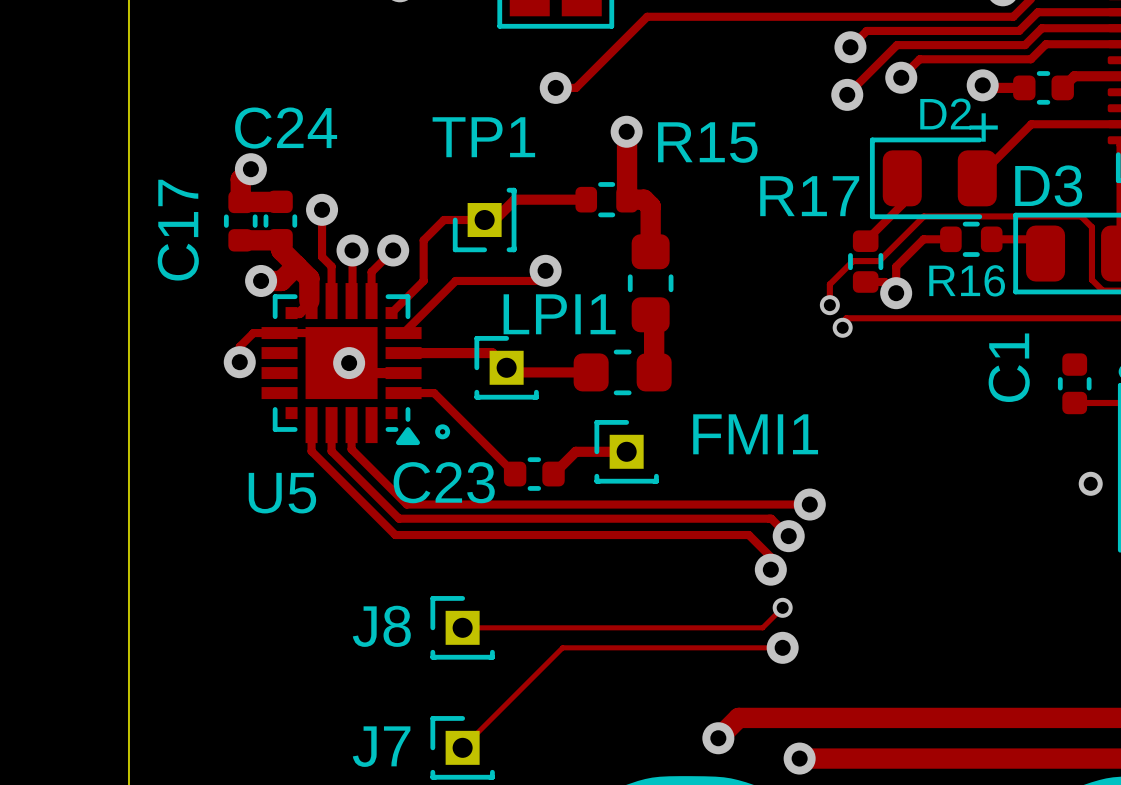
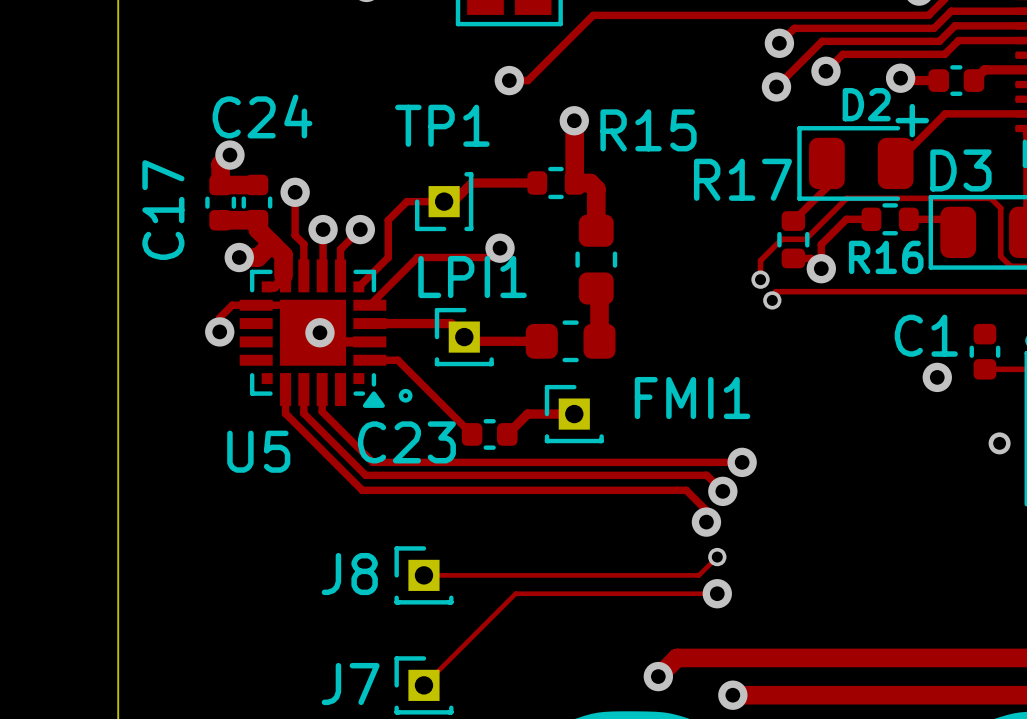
LPI1 name position: LPI1 (559, 314) -> LPI1 (472, 277)
C1 name rotation: 0° (1009, 367) -> 90° clockwise (926, 335)
via: none -> (937, 377)

